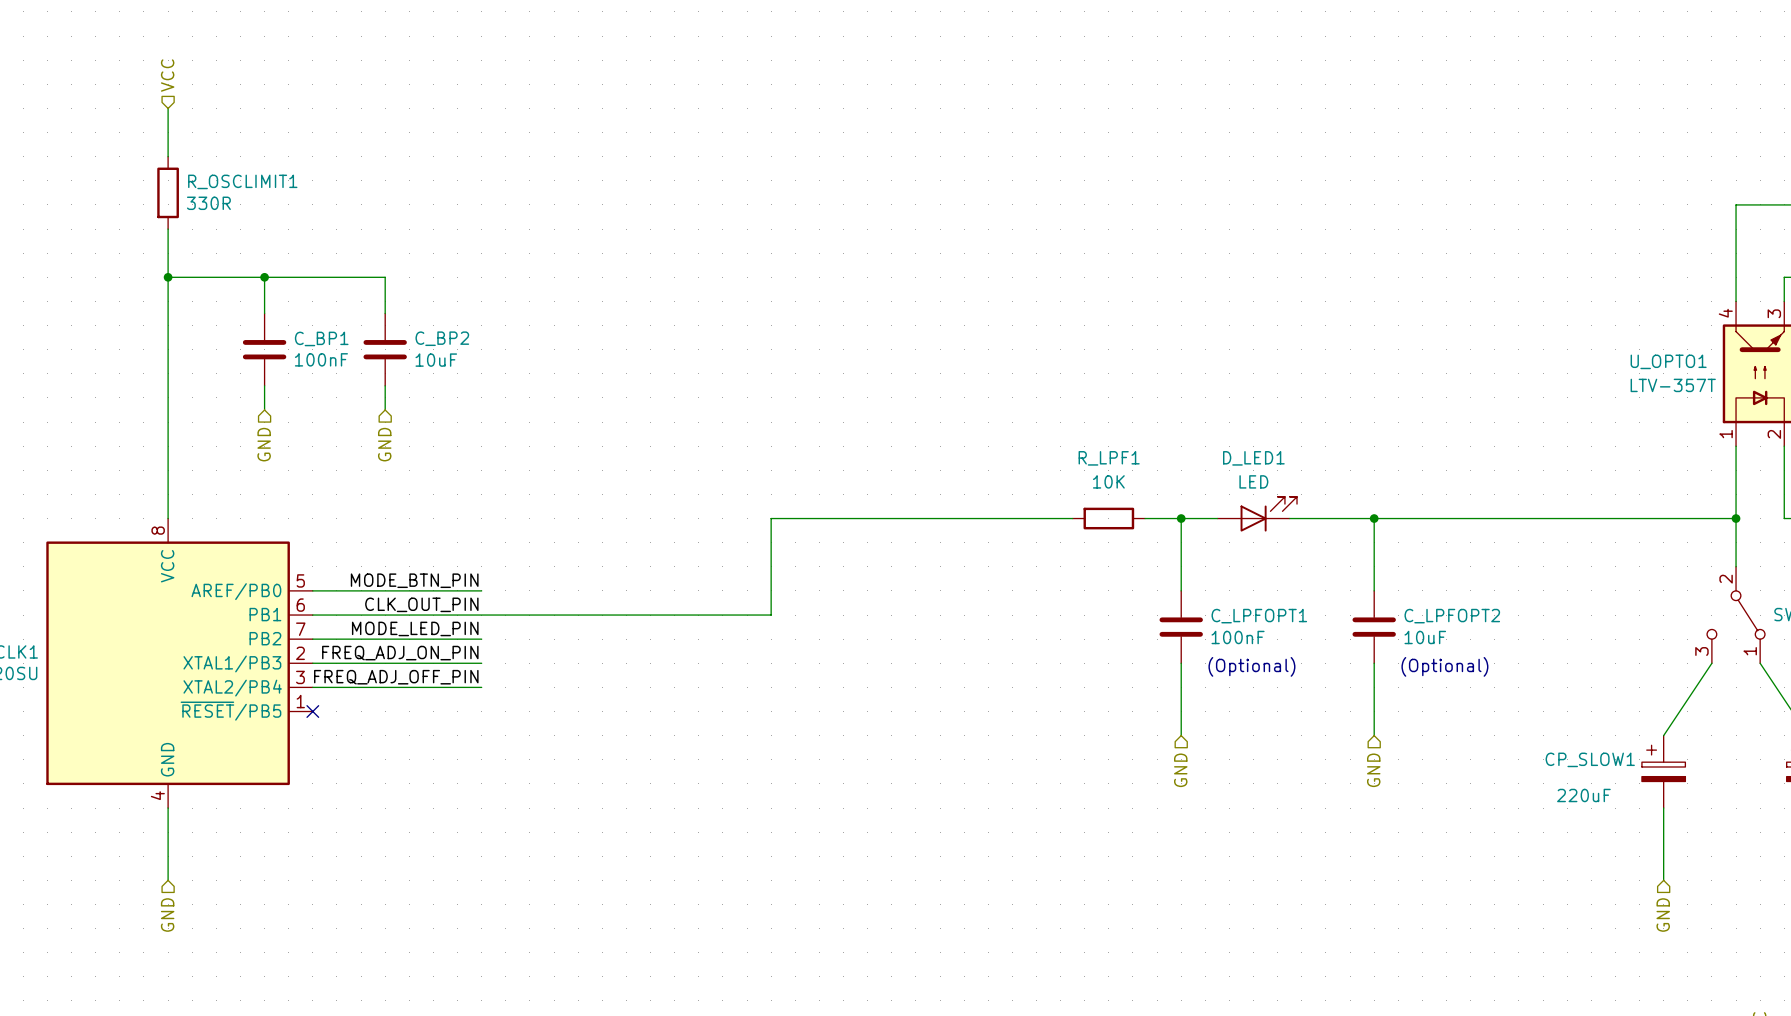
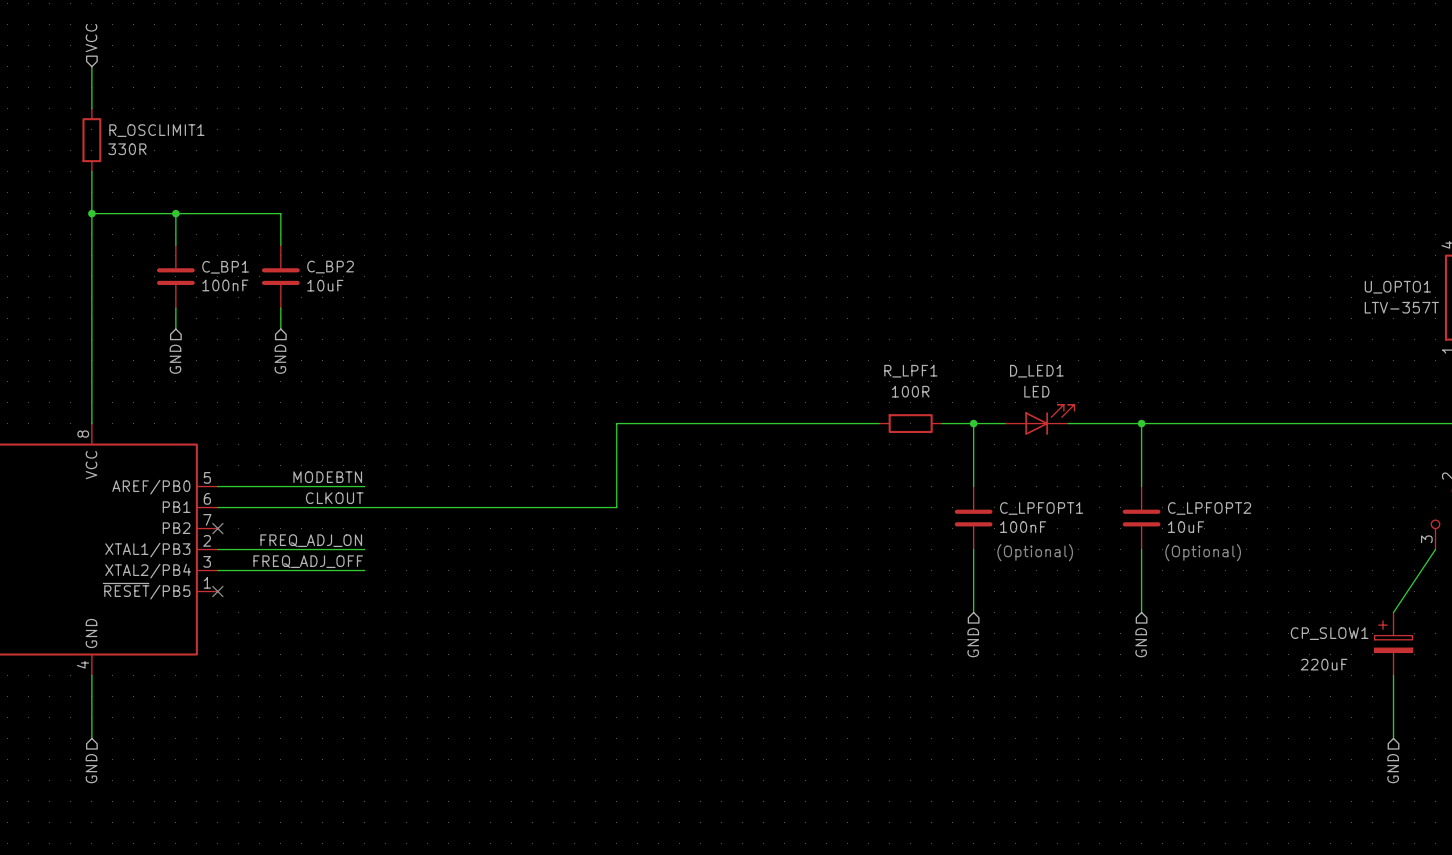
R_LPF1 value: 10K (1108, 481) -> 100R (910, 391)
label: MODE_BTN_PIN (414, 580) -> MODEBTN (327, 477)
label: CLK_OUT_PIN (421, 604) -> CLKOUT (334, 498)
label: MODE_LED_PIN (415, 628) -> none
wire: (312, 639) (481, 639) -> none
no-connect mark: none -> (217, 528)
label: FREQ_ADJ_ON_PIN (400, 653) -> FREQ_ADJ_ON (311, 540)
label: FREQ_ADJ_OFF_PIN (396, 677) -> FREQ_ADJ_OFF (308, 561)

